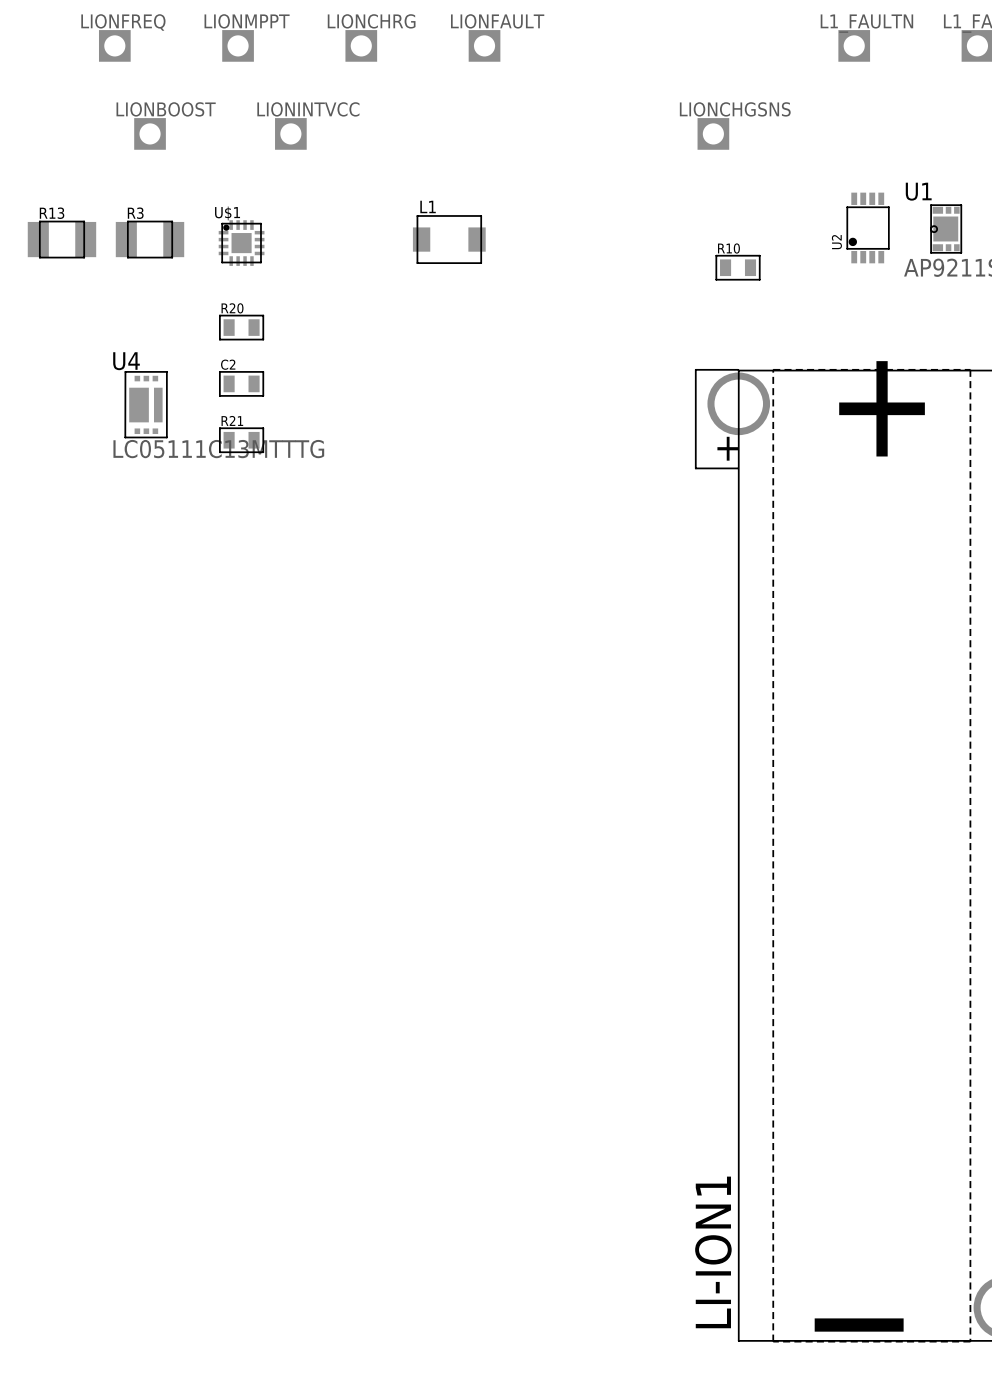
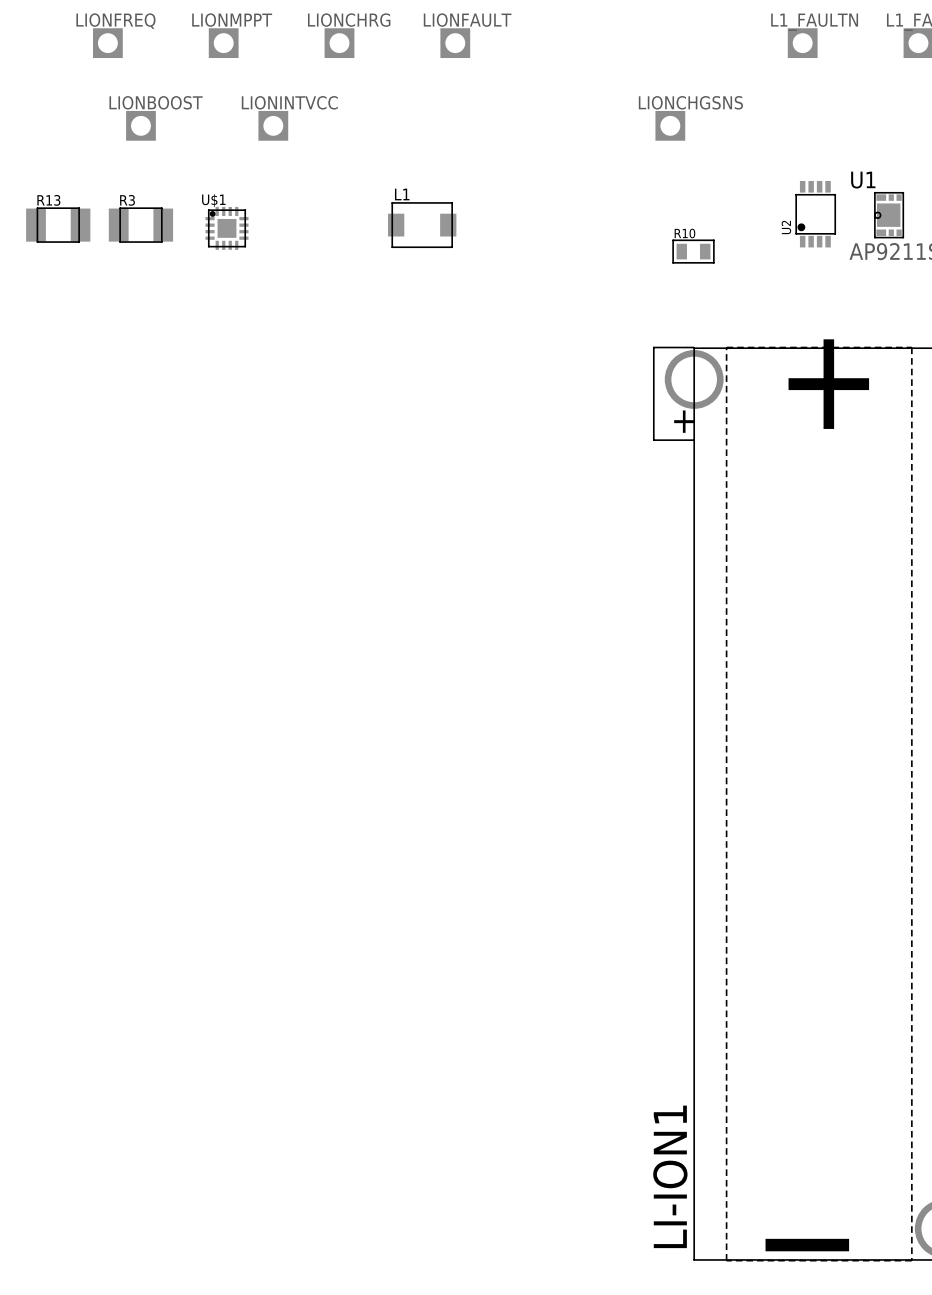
R20: (241, 327) -> none
C2: (241, 383) -> none
U4: LC05111C13MTTTG (146, 404) -> none
R21: (241, 440) -> none

